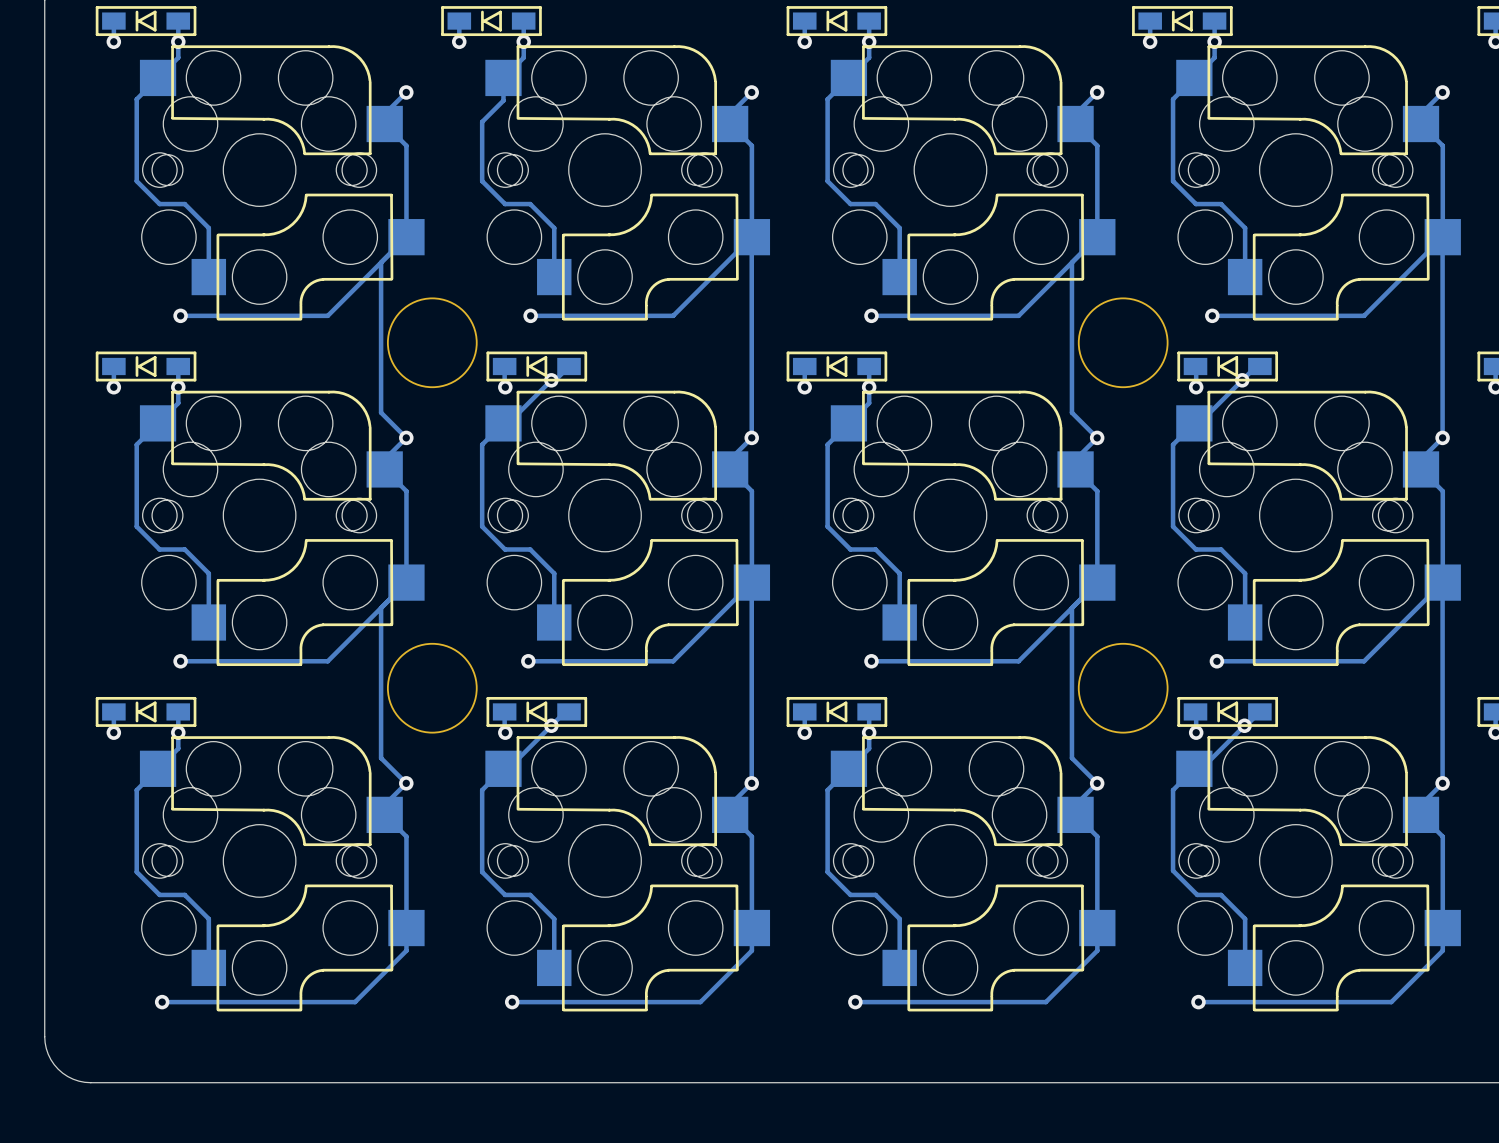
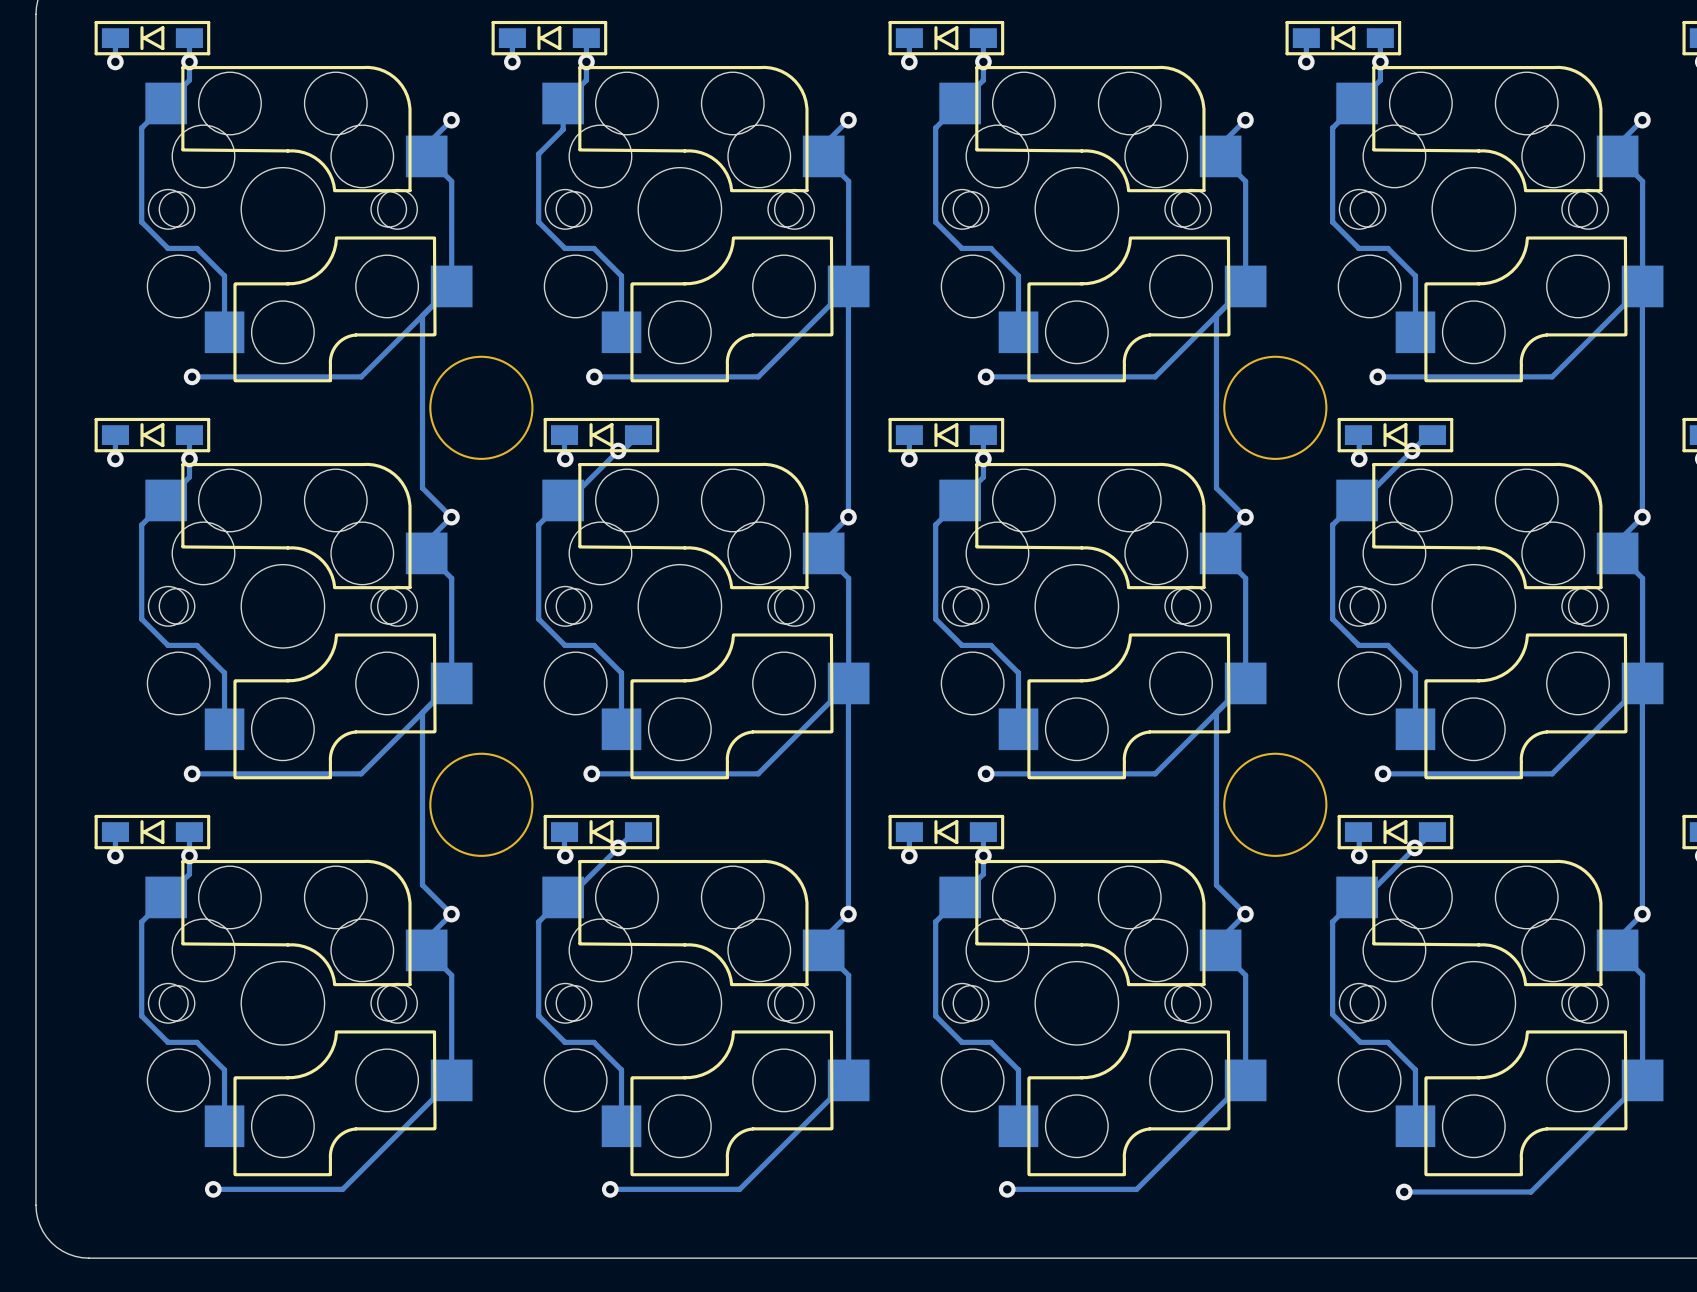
track: (406, 928) (406, 950) (355, 1002) (162, 1002) -> (451, 1080) (342, 1189) (213, 1189)
track: (751, 928) (751, 950) (700, 1002) (512, 1002) -> (848, 1080) (739, 1189) (610, 1189)
track: (1097, 928) (1097, 950) (1045, 1002) (855, 1002) -> (1245, 1080) (1136, 1189) (1007, 1189)
track: (1442, 928) (1442, 950) (1391, 1002) (1198, 1002) -> (1642, 1080) (1531, 1191) (1404, 1191)
via position: (162, 1002) -> (213, 1189)
via position: (512, 1002) -> (610, 1189)
via position: (855, 1002) -> (1007, 1189)
via position: (1198, 1002) -> (1404, 1191)

